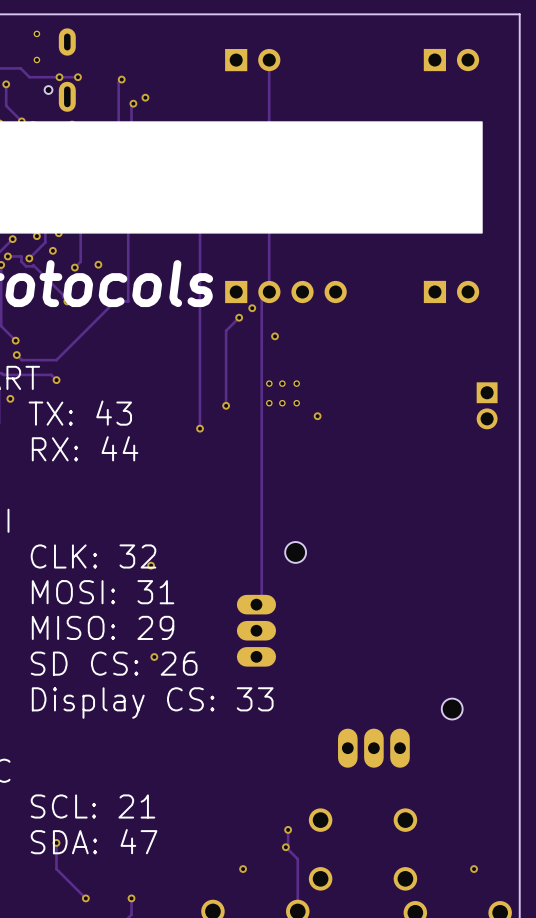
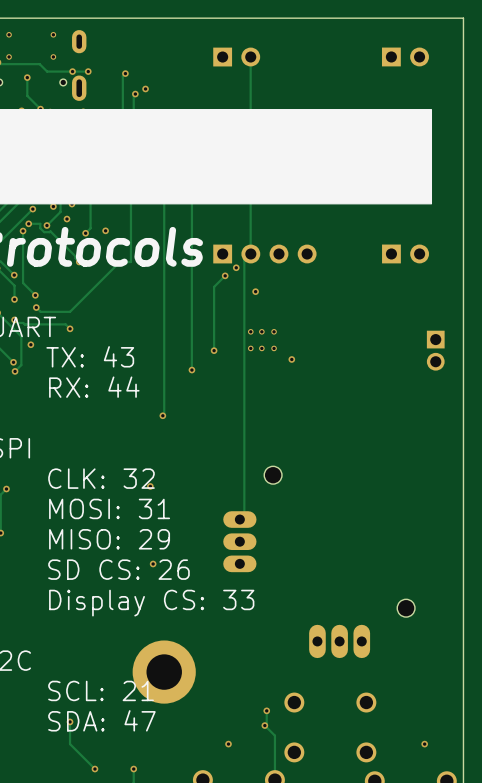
track: none -> (164, 189) (164, 414) (161, 417)
via: none -> (162, 415)
part: none -> (164, 672)

